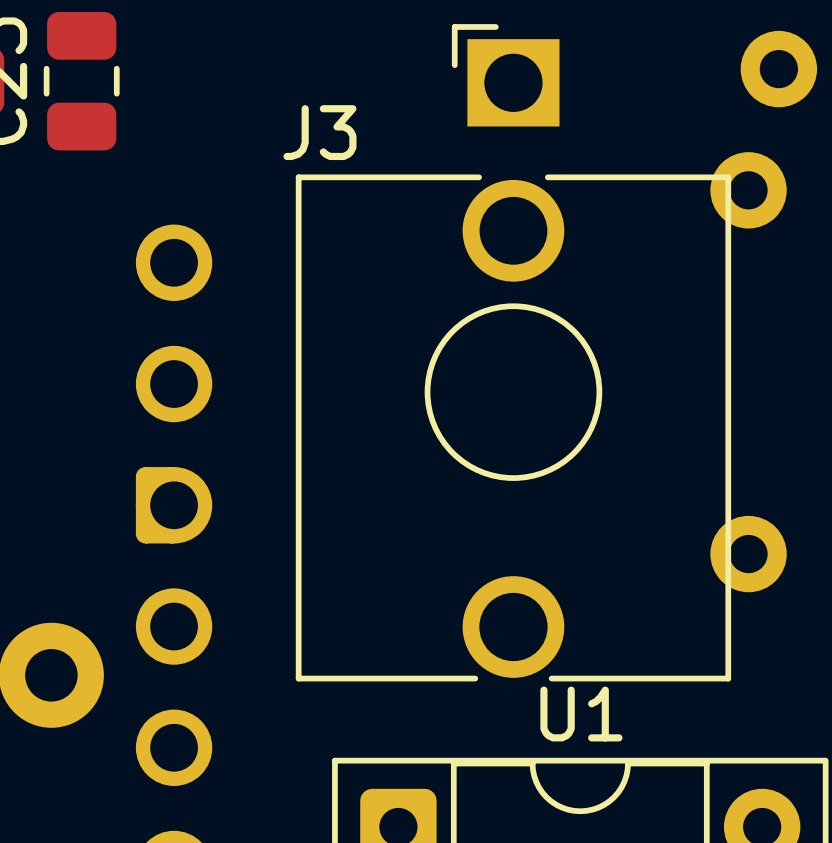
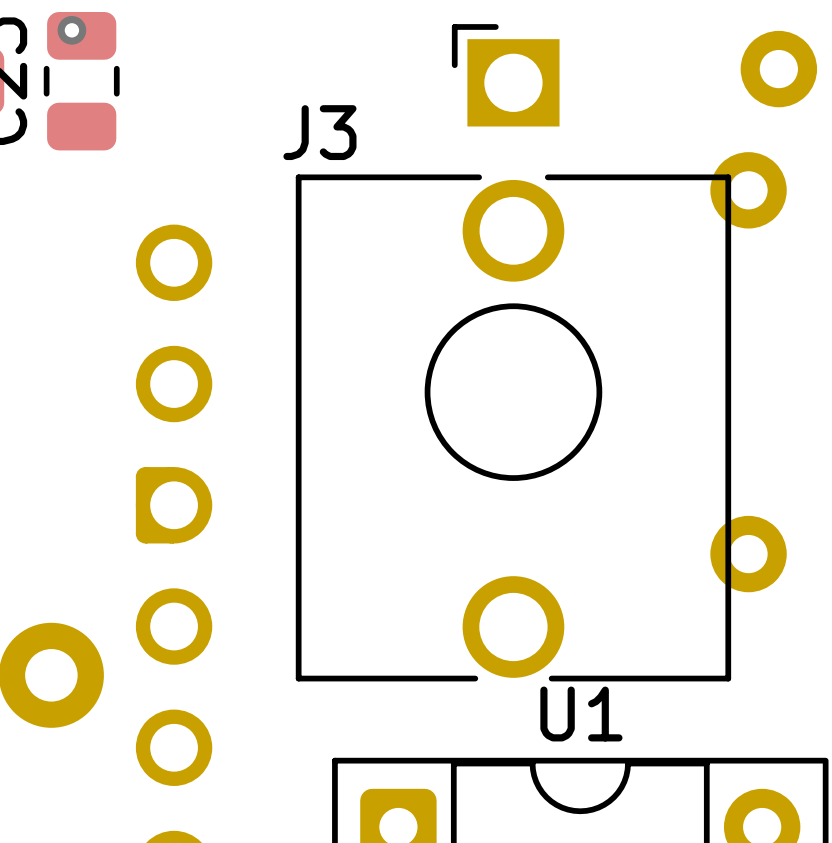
via: none -> (71, 30)

